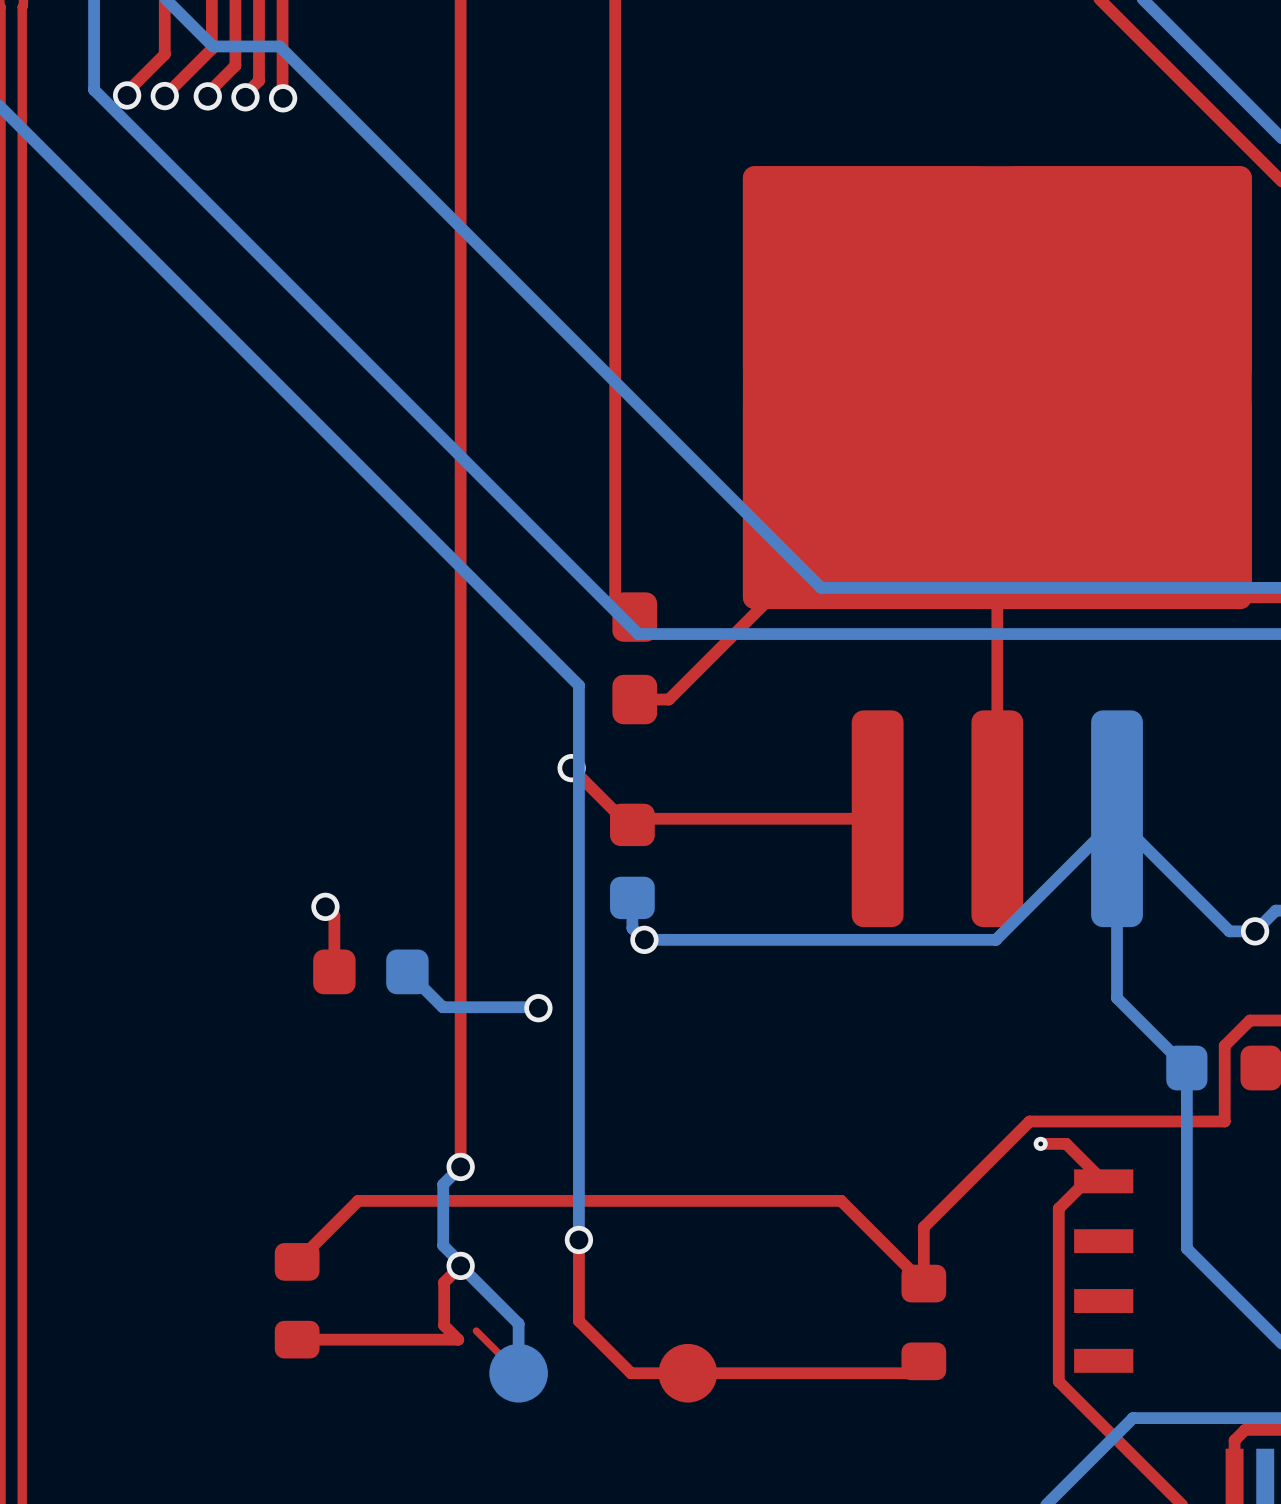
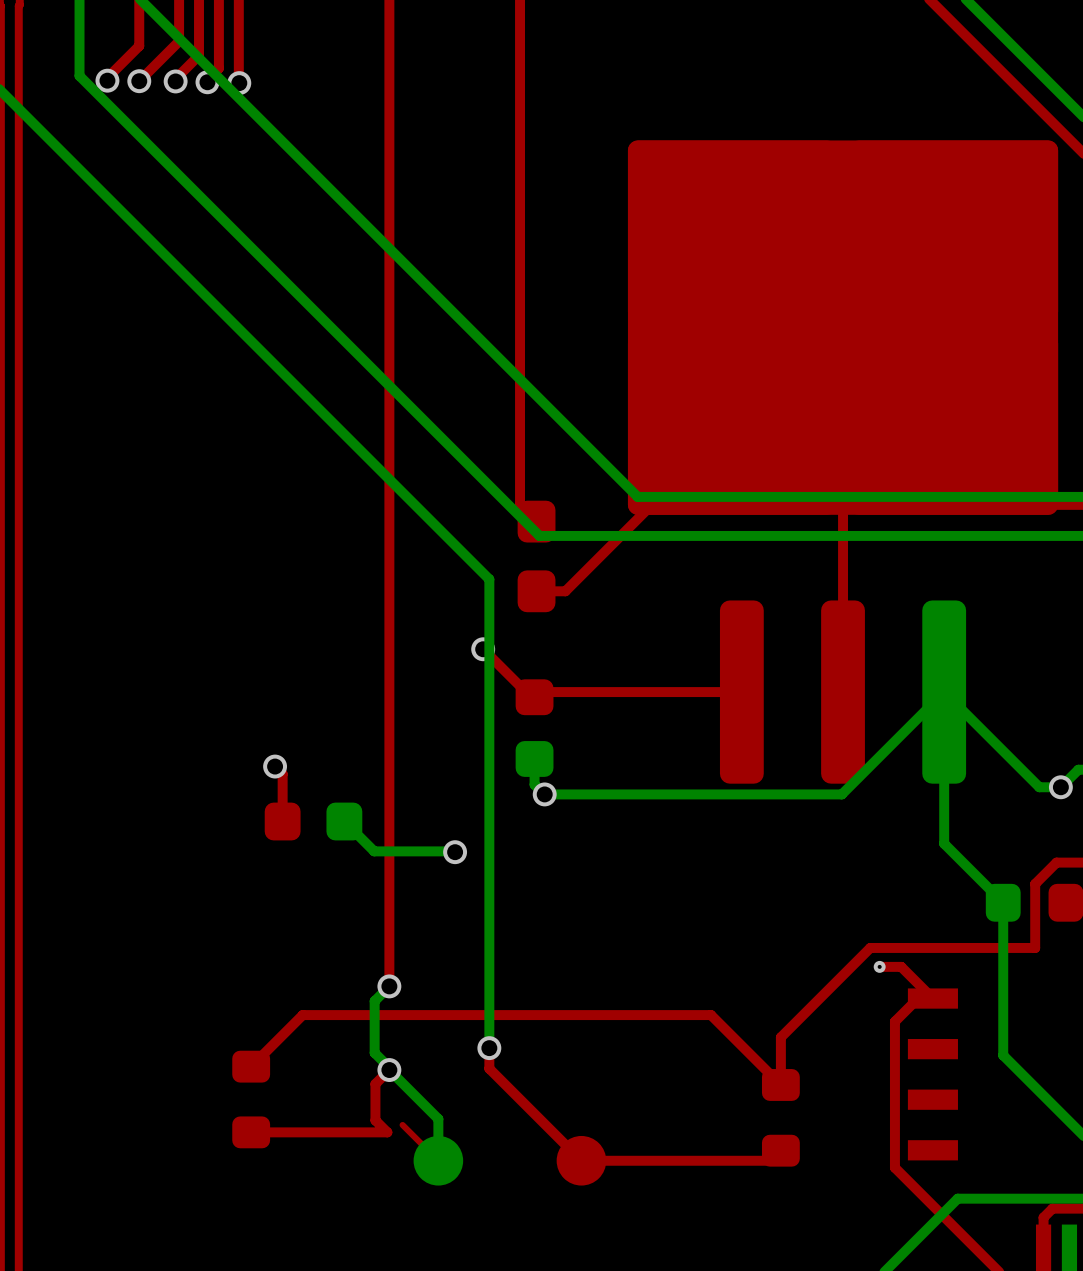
bottom track: (213, 46) (279, 46) (821, 587) -> (180, 39) (637, 496) (694, 496)
top track: (578, 1264) (578, 1321) (631, 1373) (687, 1373) -> (489, 1068) (581, 1160)

